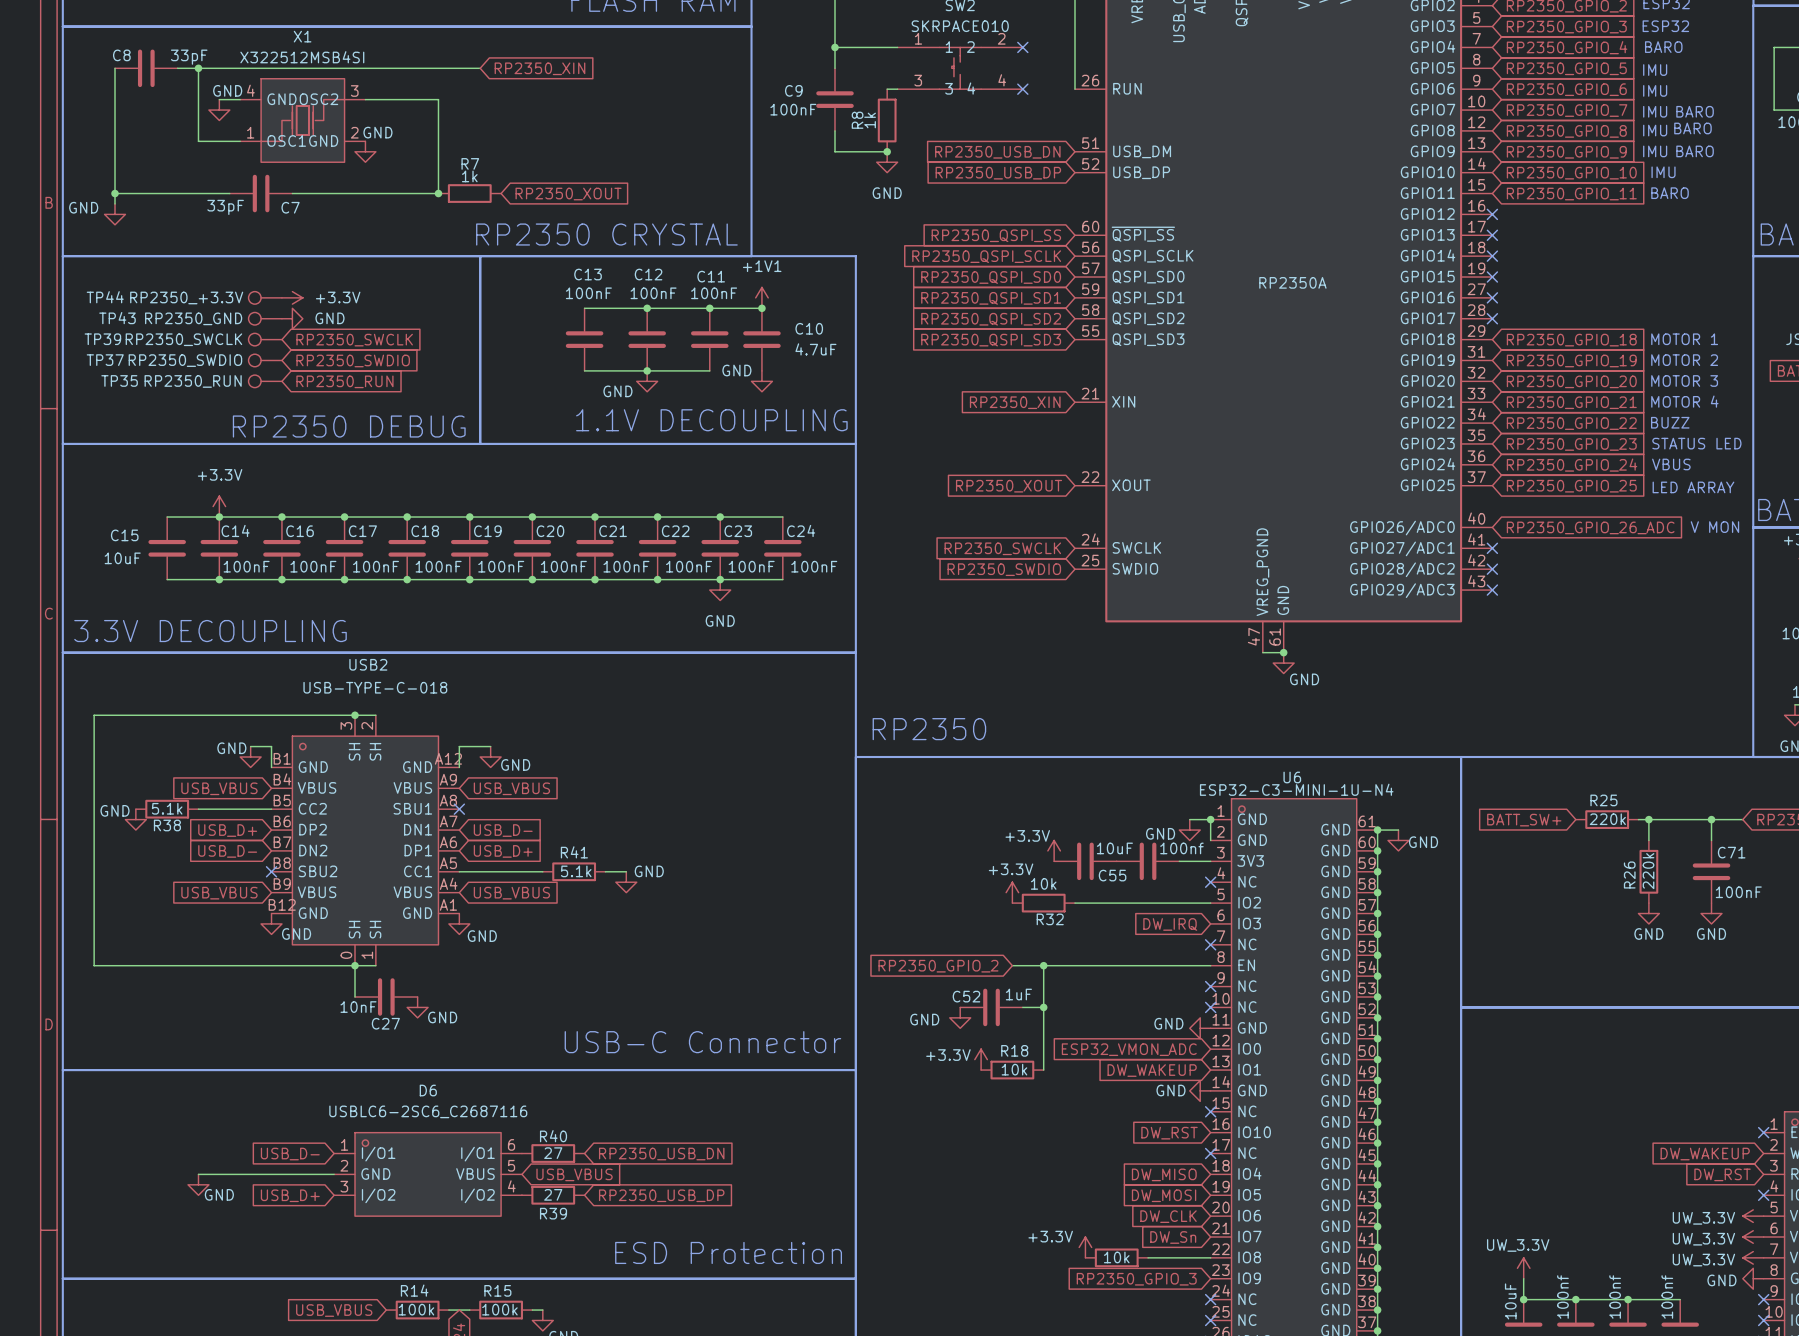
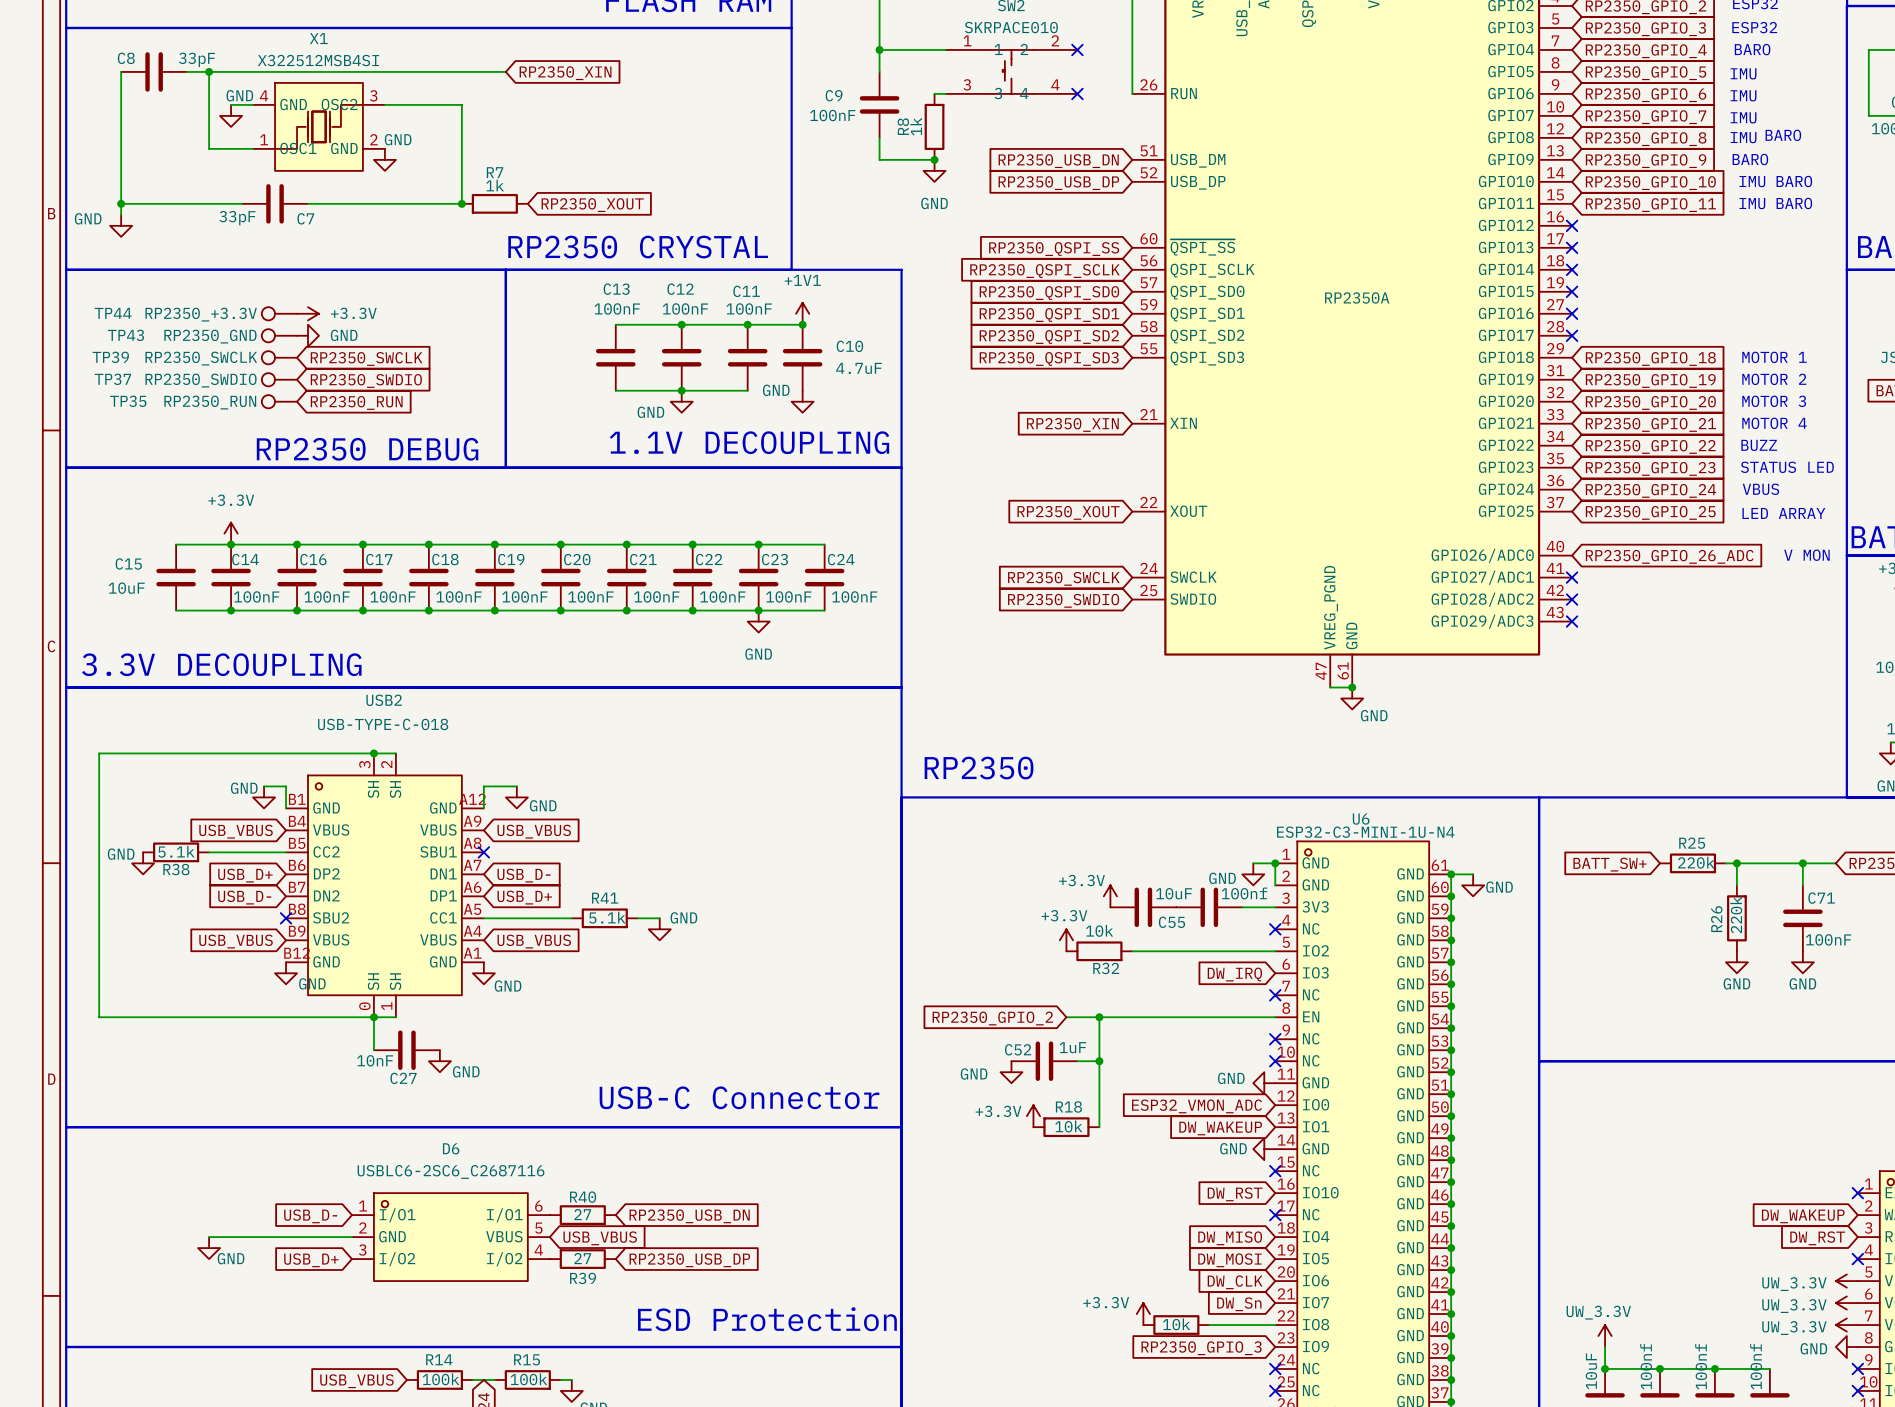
text: BARO (1695, 111) -> none
text position: IMU (1655, 151) -> IMU (1752, 203)
text: none -> BARO (1750, 159)
text: BARO (1695, 151) -> none
text: none -> BARO (1794, 181)
text: BARO (1670, 193) -> none
text: none -> BARO (1794, 203)

